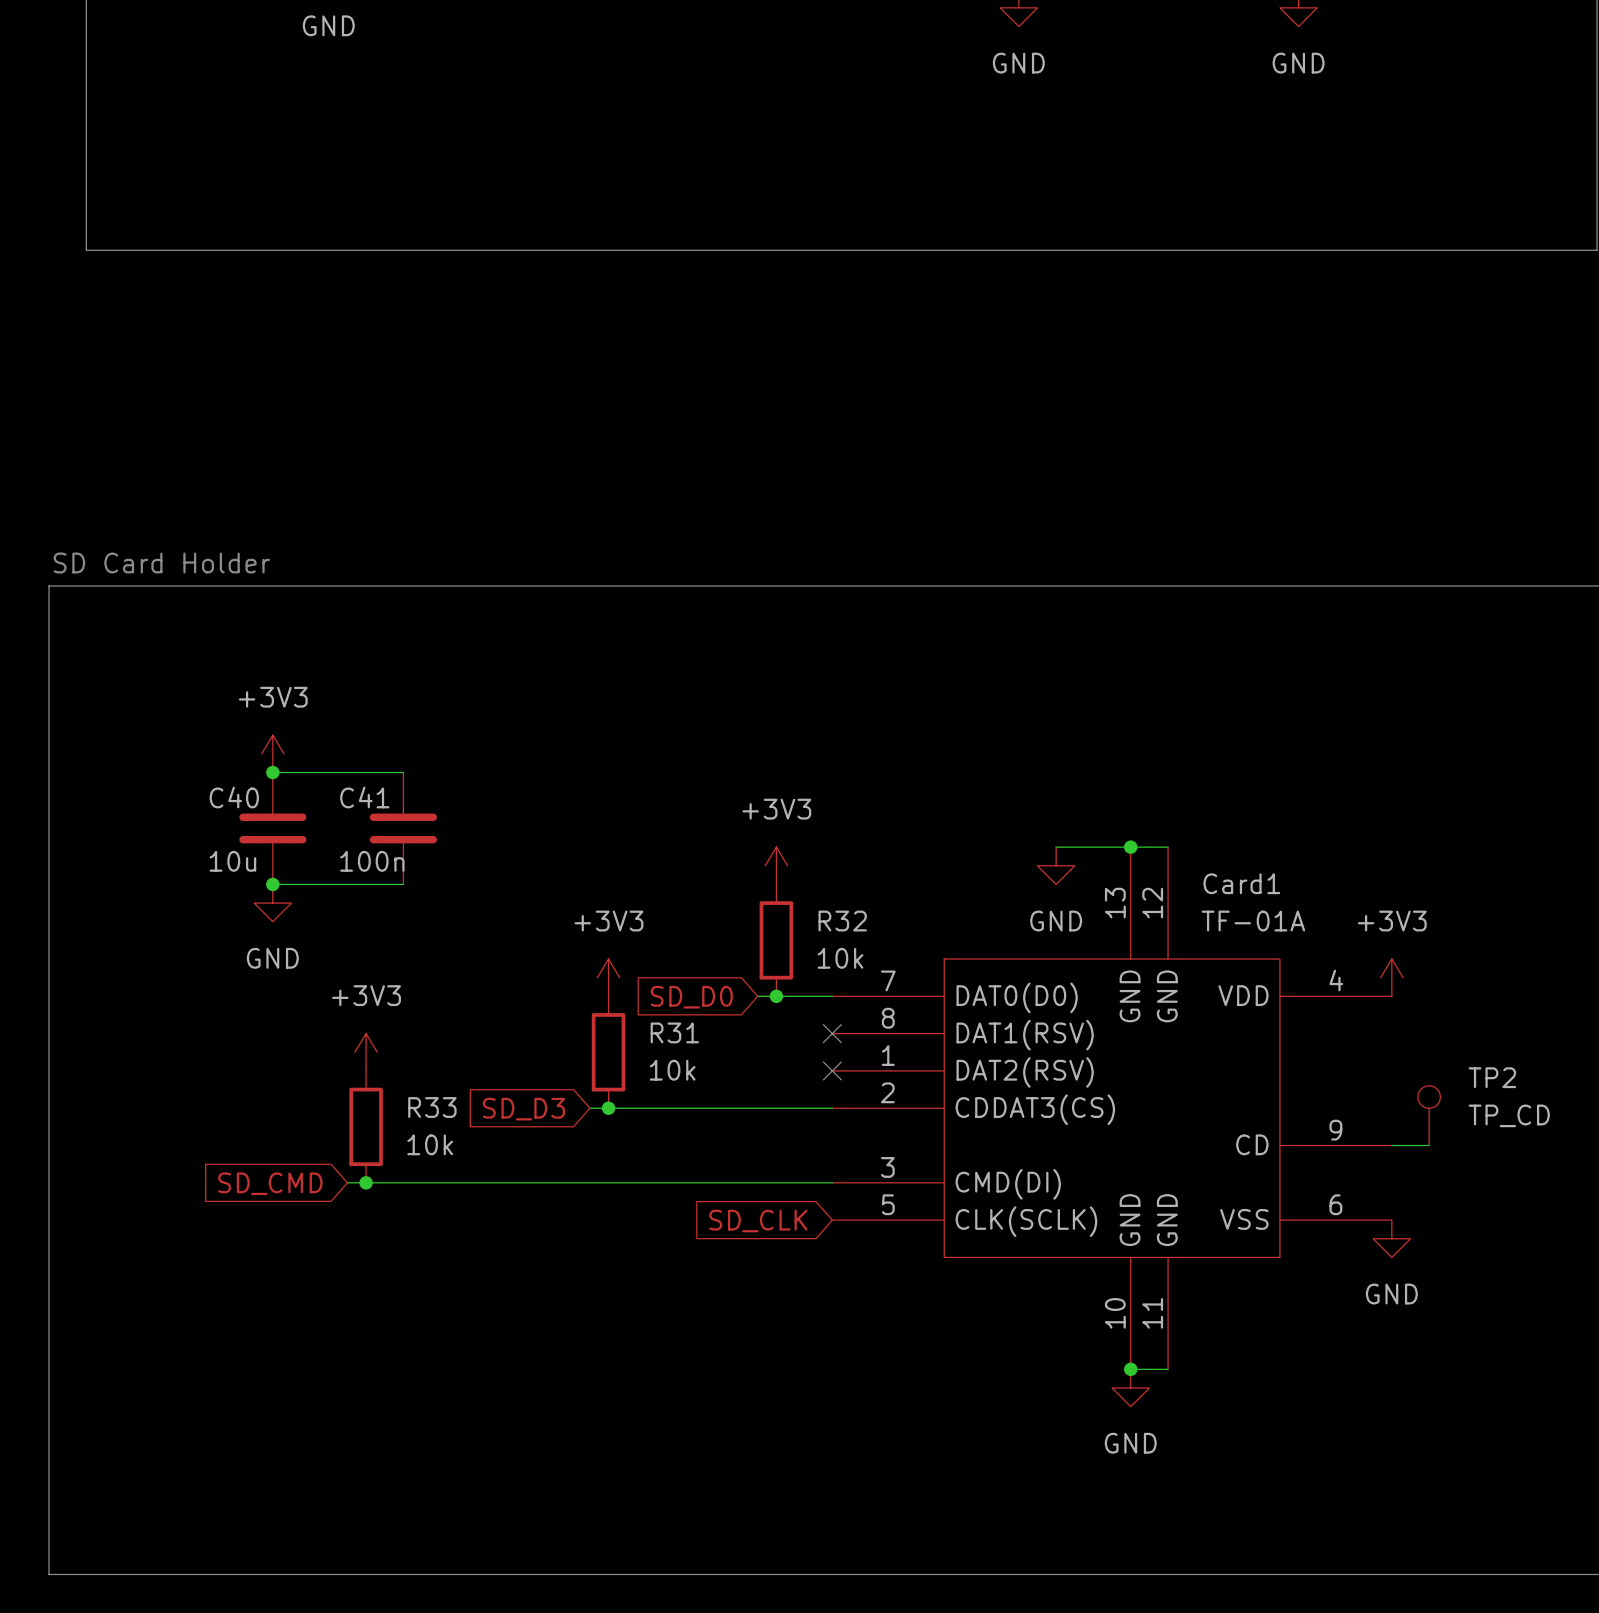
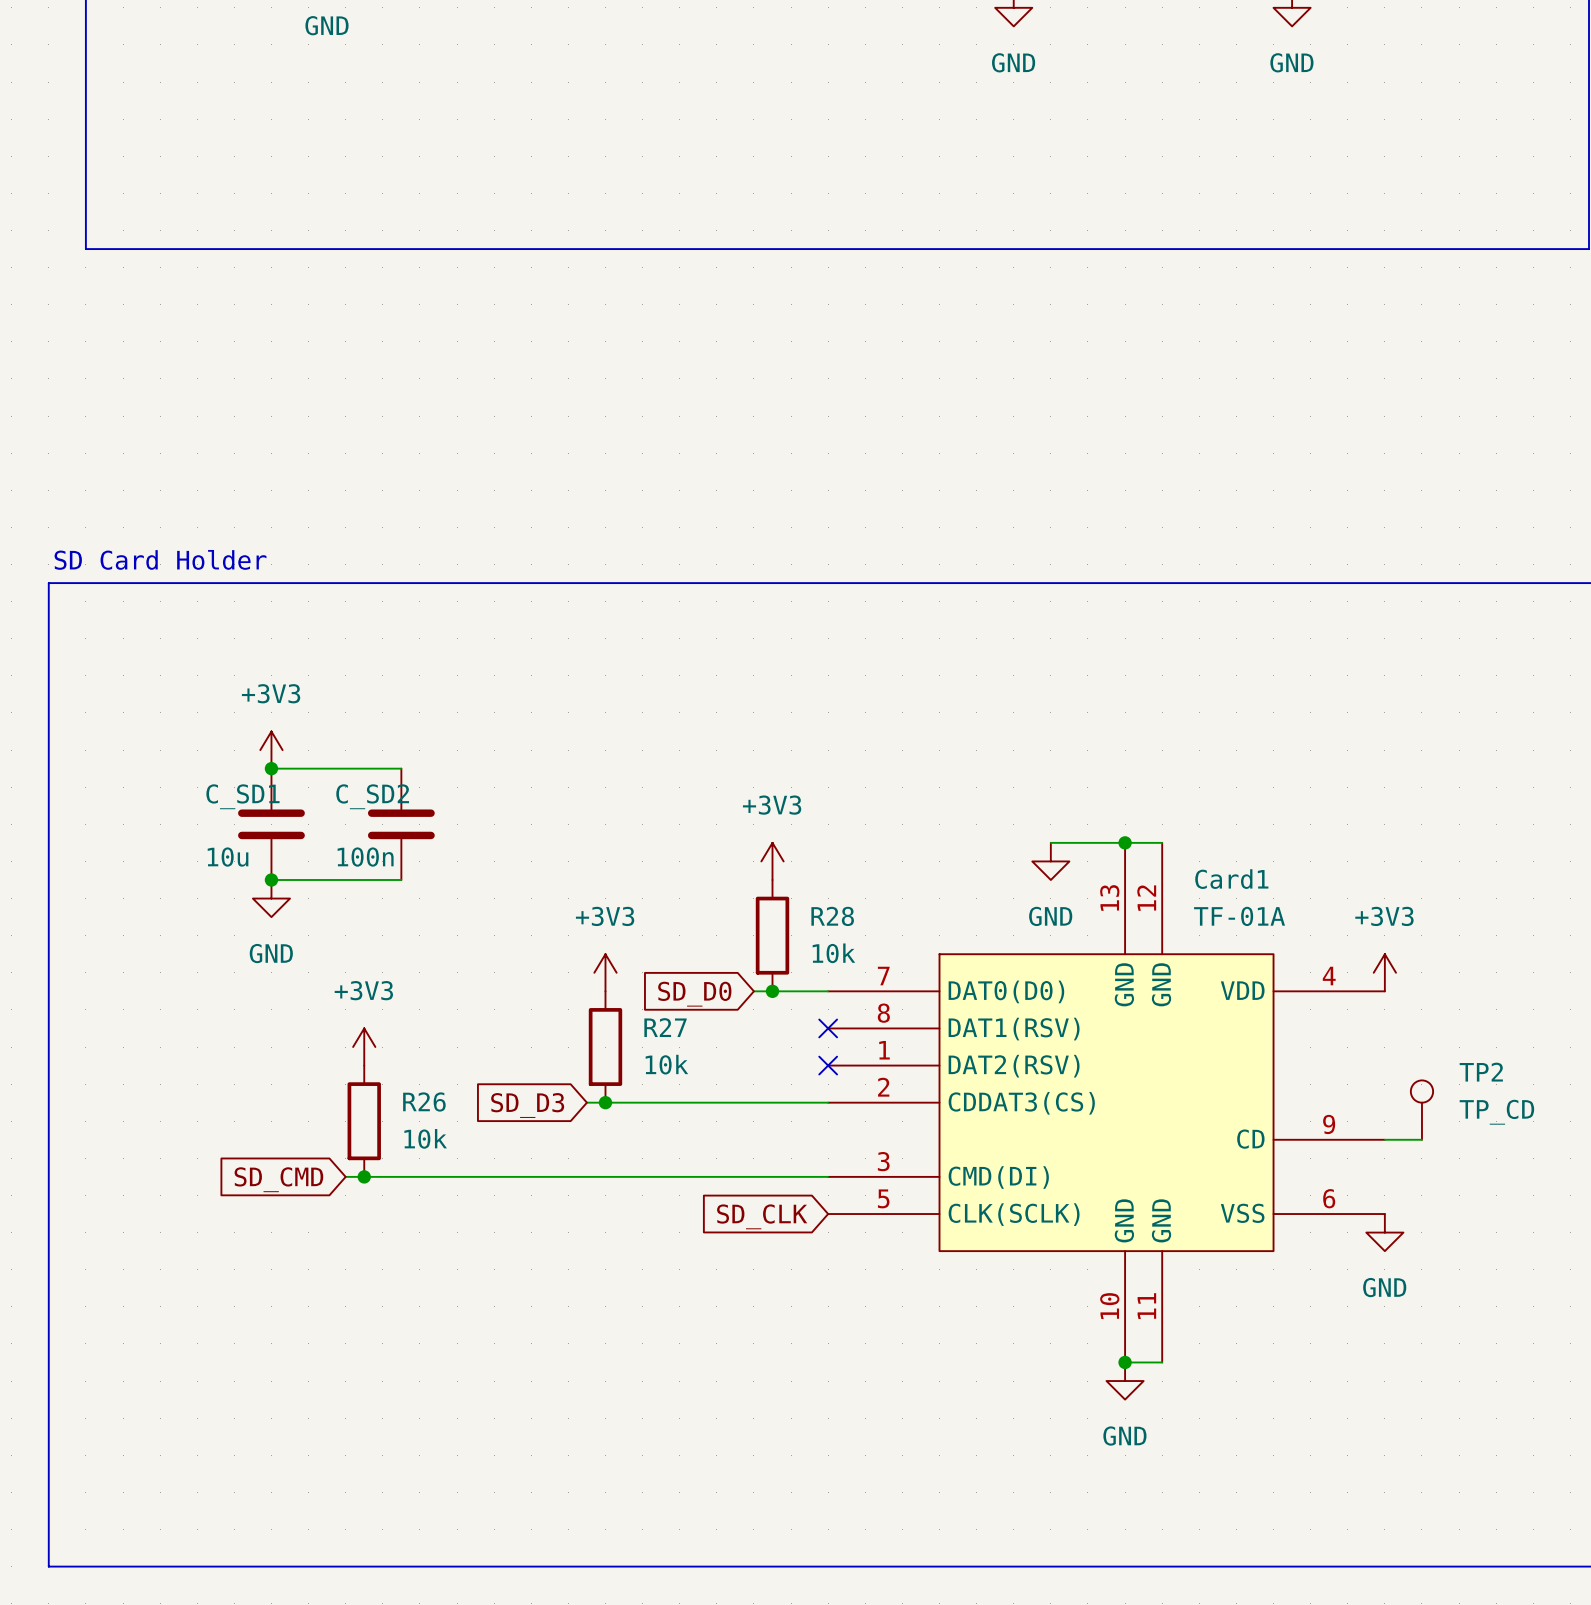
C40 name: C40 (234, 797) -> C_SD1 (242, 796)
C41 name: C41 (364, 797) -> C_SD2 (372, 796)
R32 name: R32 (842, 921) -> R28 (832, 916)
R31 name: R31 (674, 1032) -> R27 (665, 1027)
R33 name: R33 (432, 1107) -> R26 (424, 1101)

